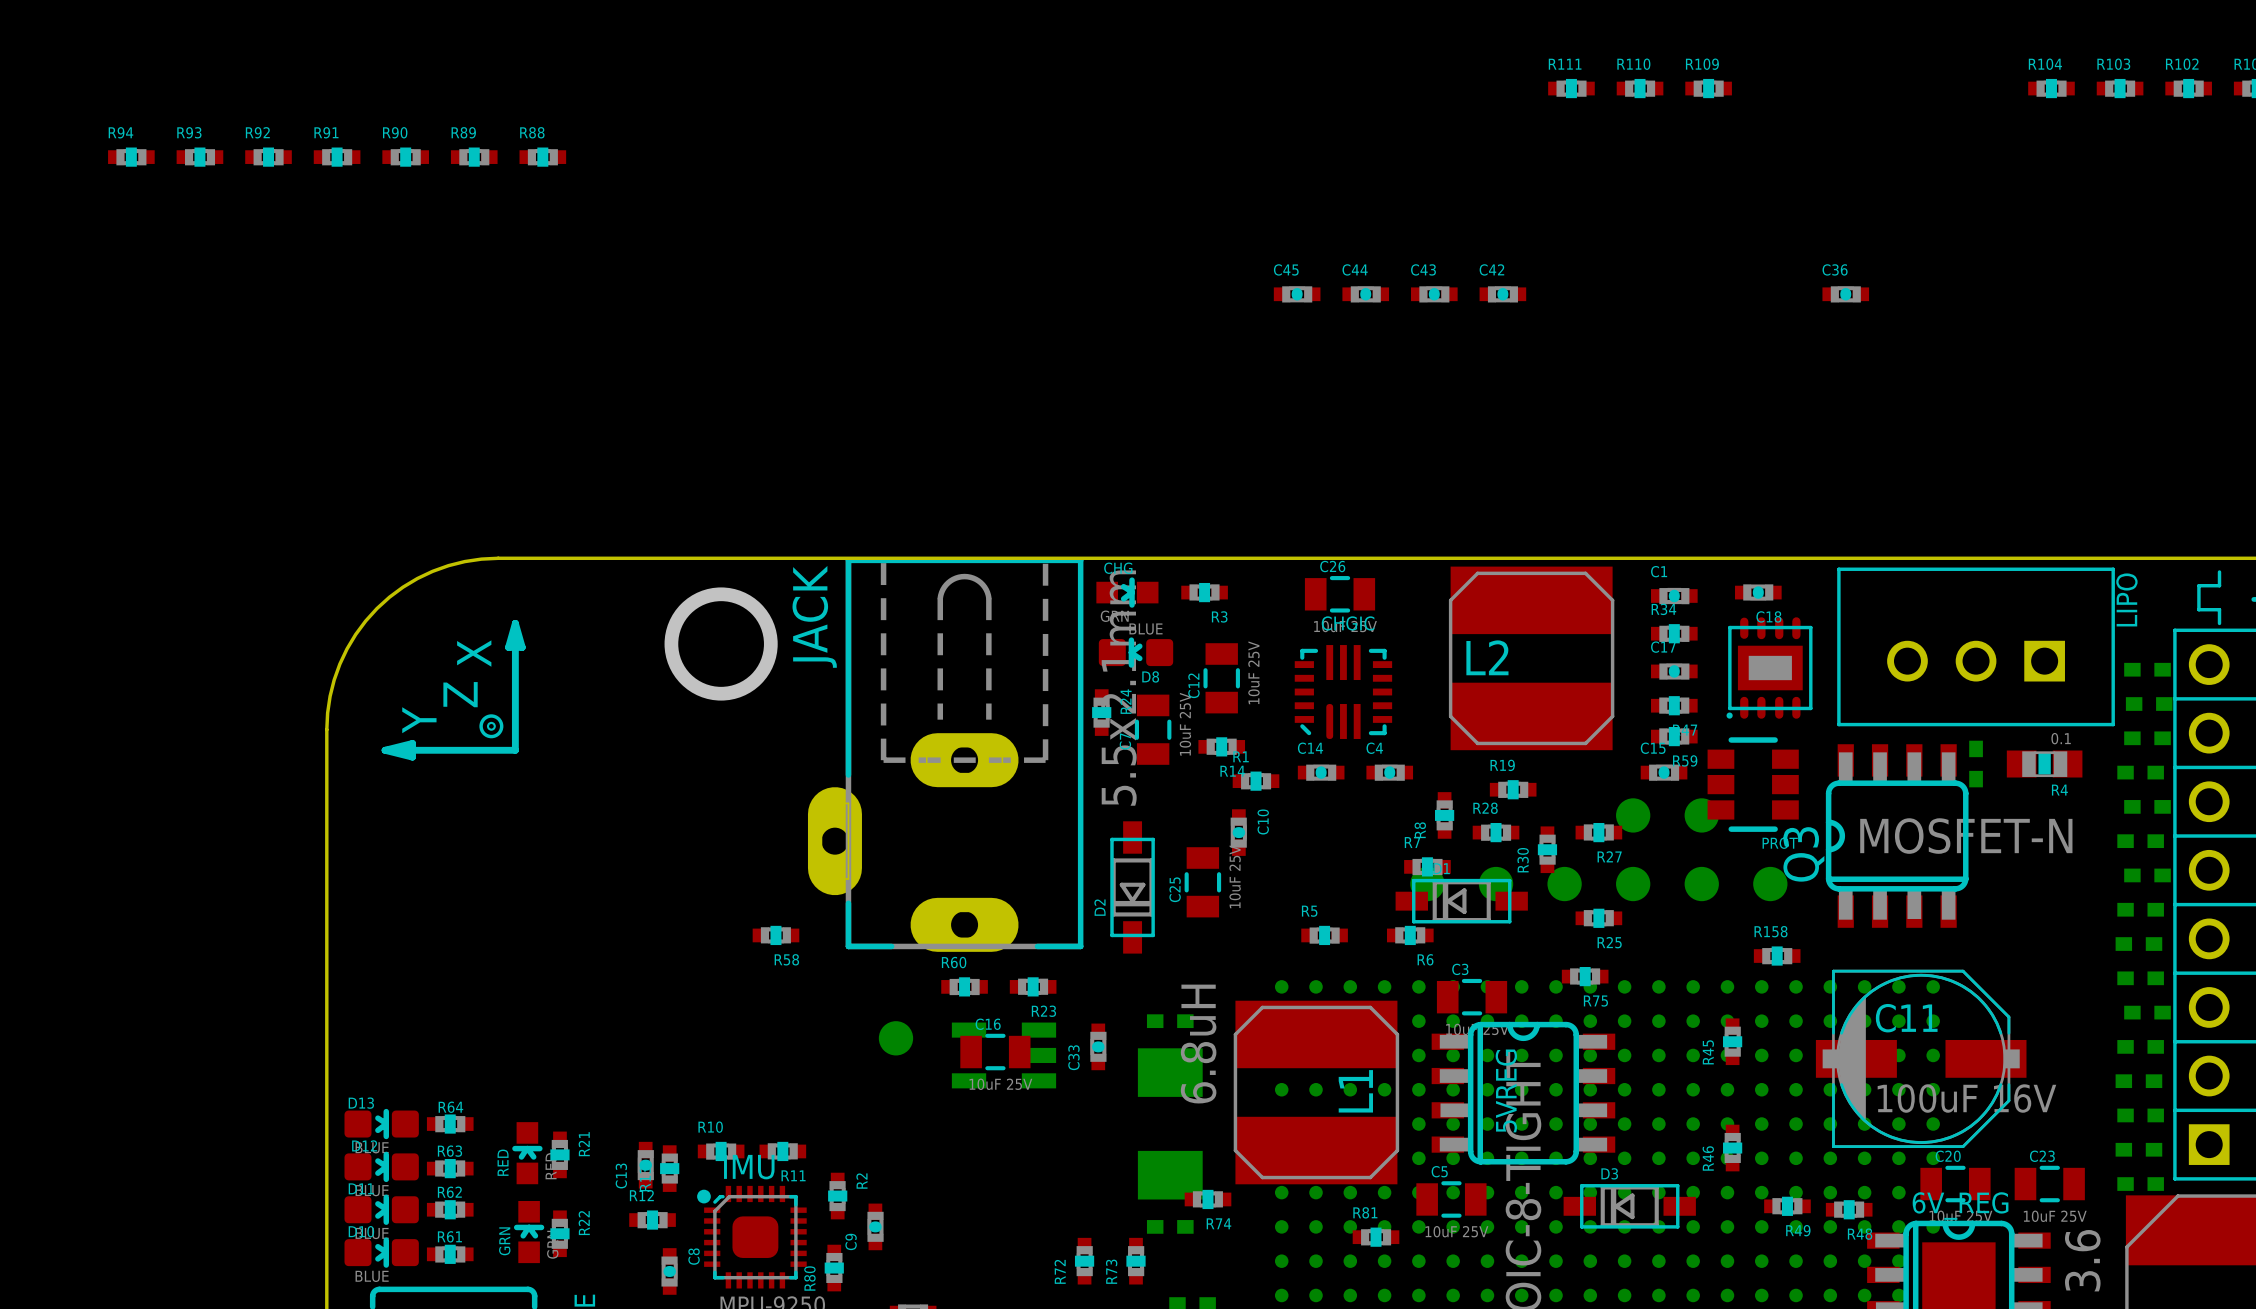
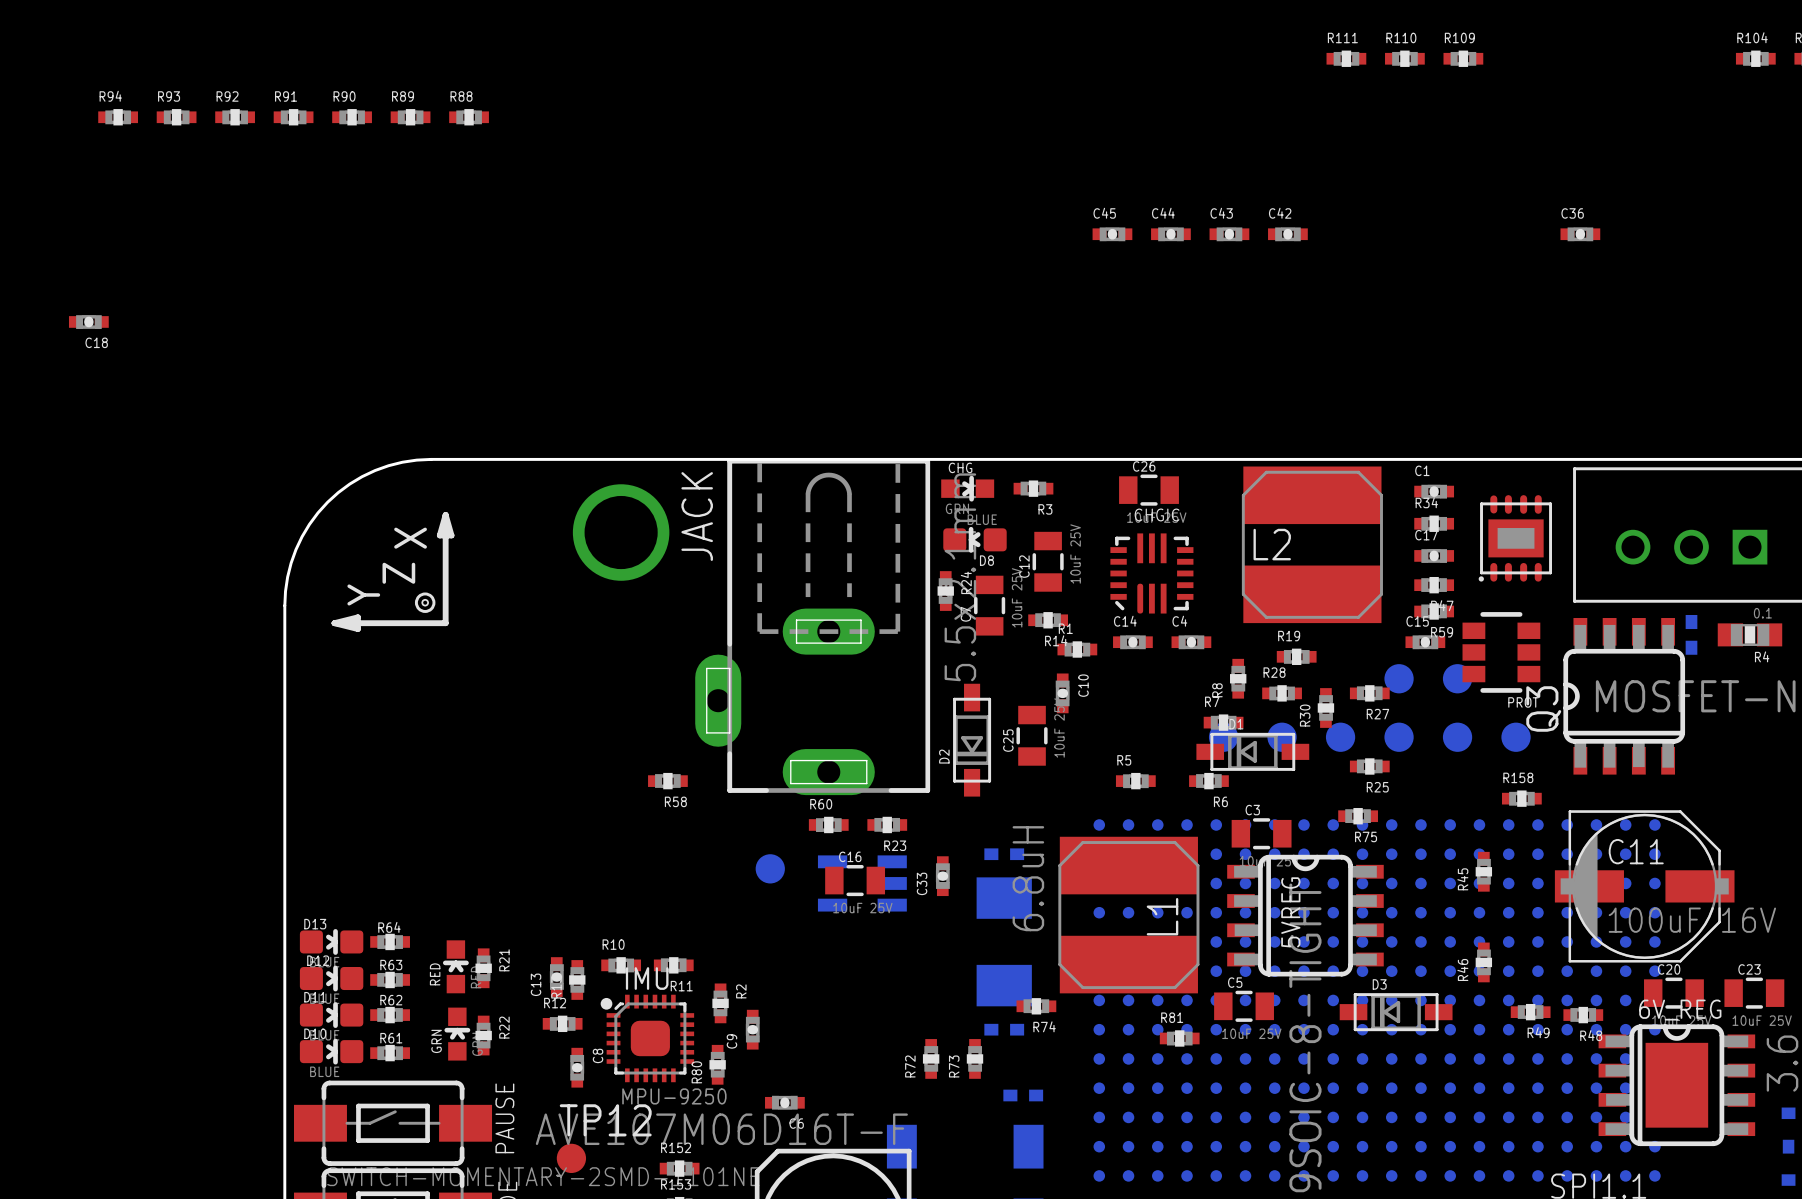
C18 position: (1758, 592) -> (88, 322)
part position: (1769, 668) -> (1515, 538)

